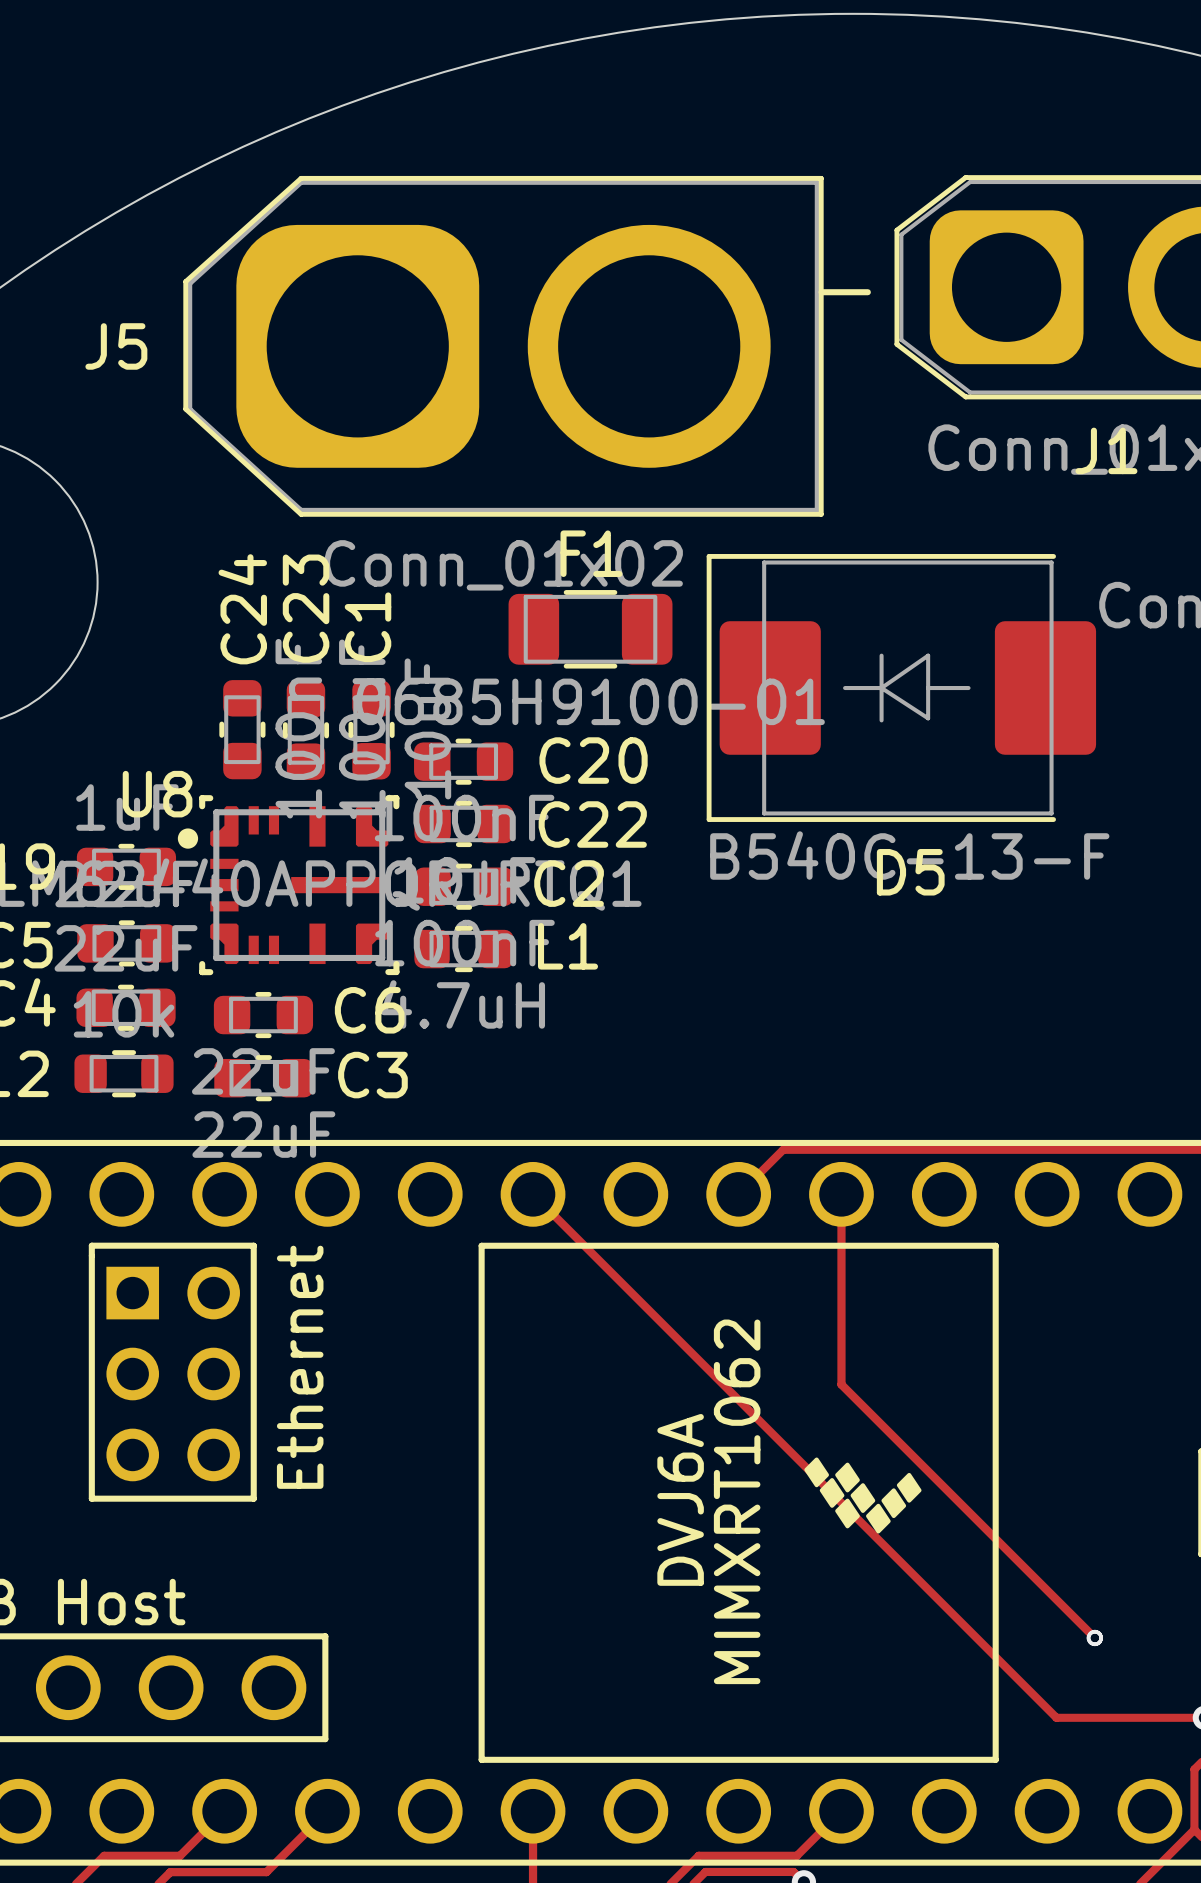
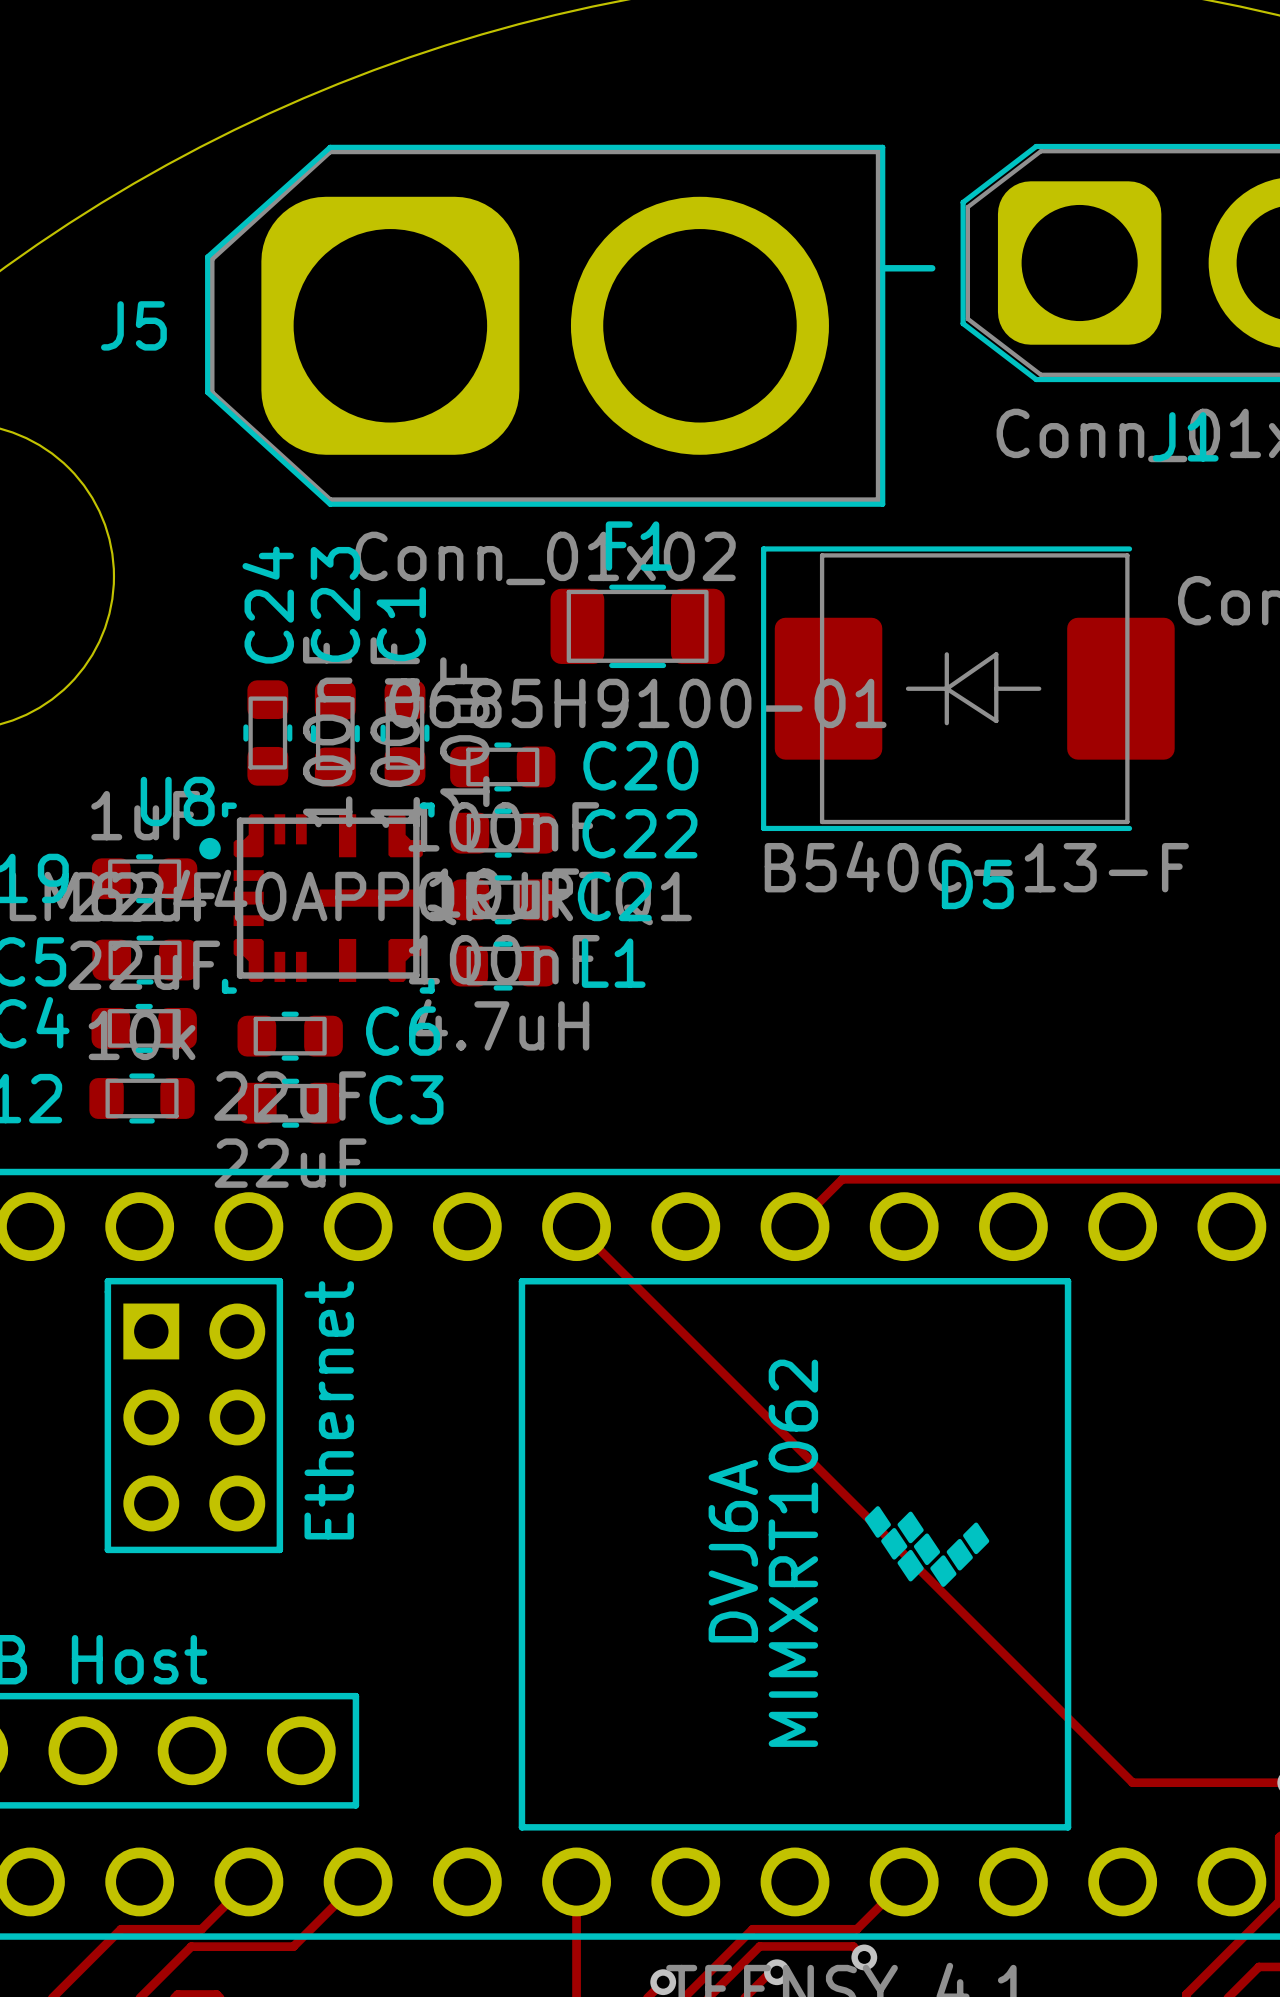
track: (841, 1194) (841, 1384) (1094, 1637) -> none
via: (1094, 1637) -> none

